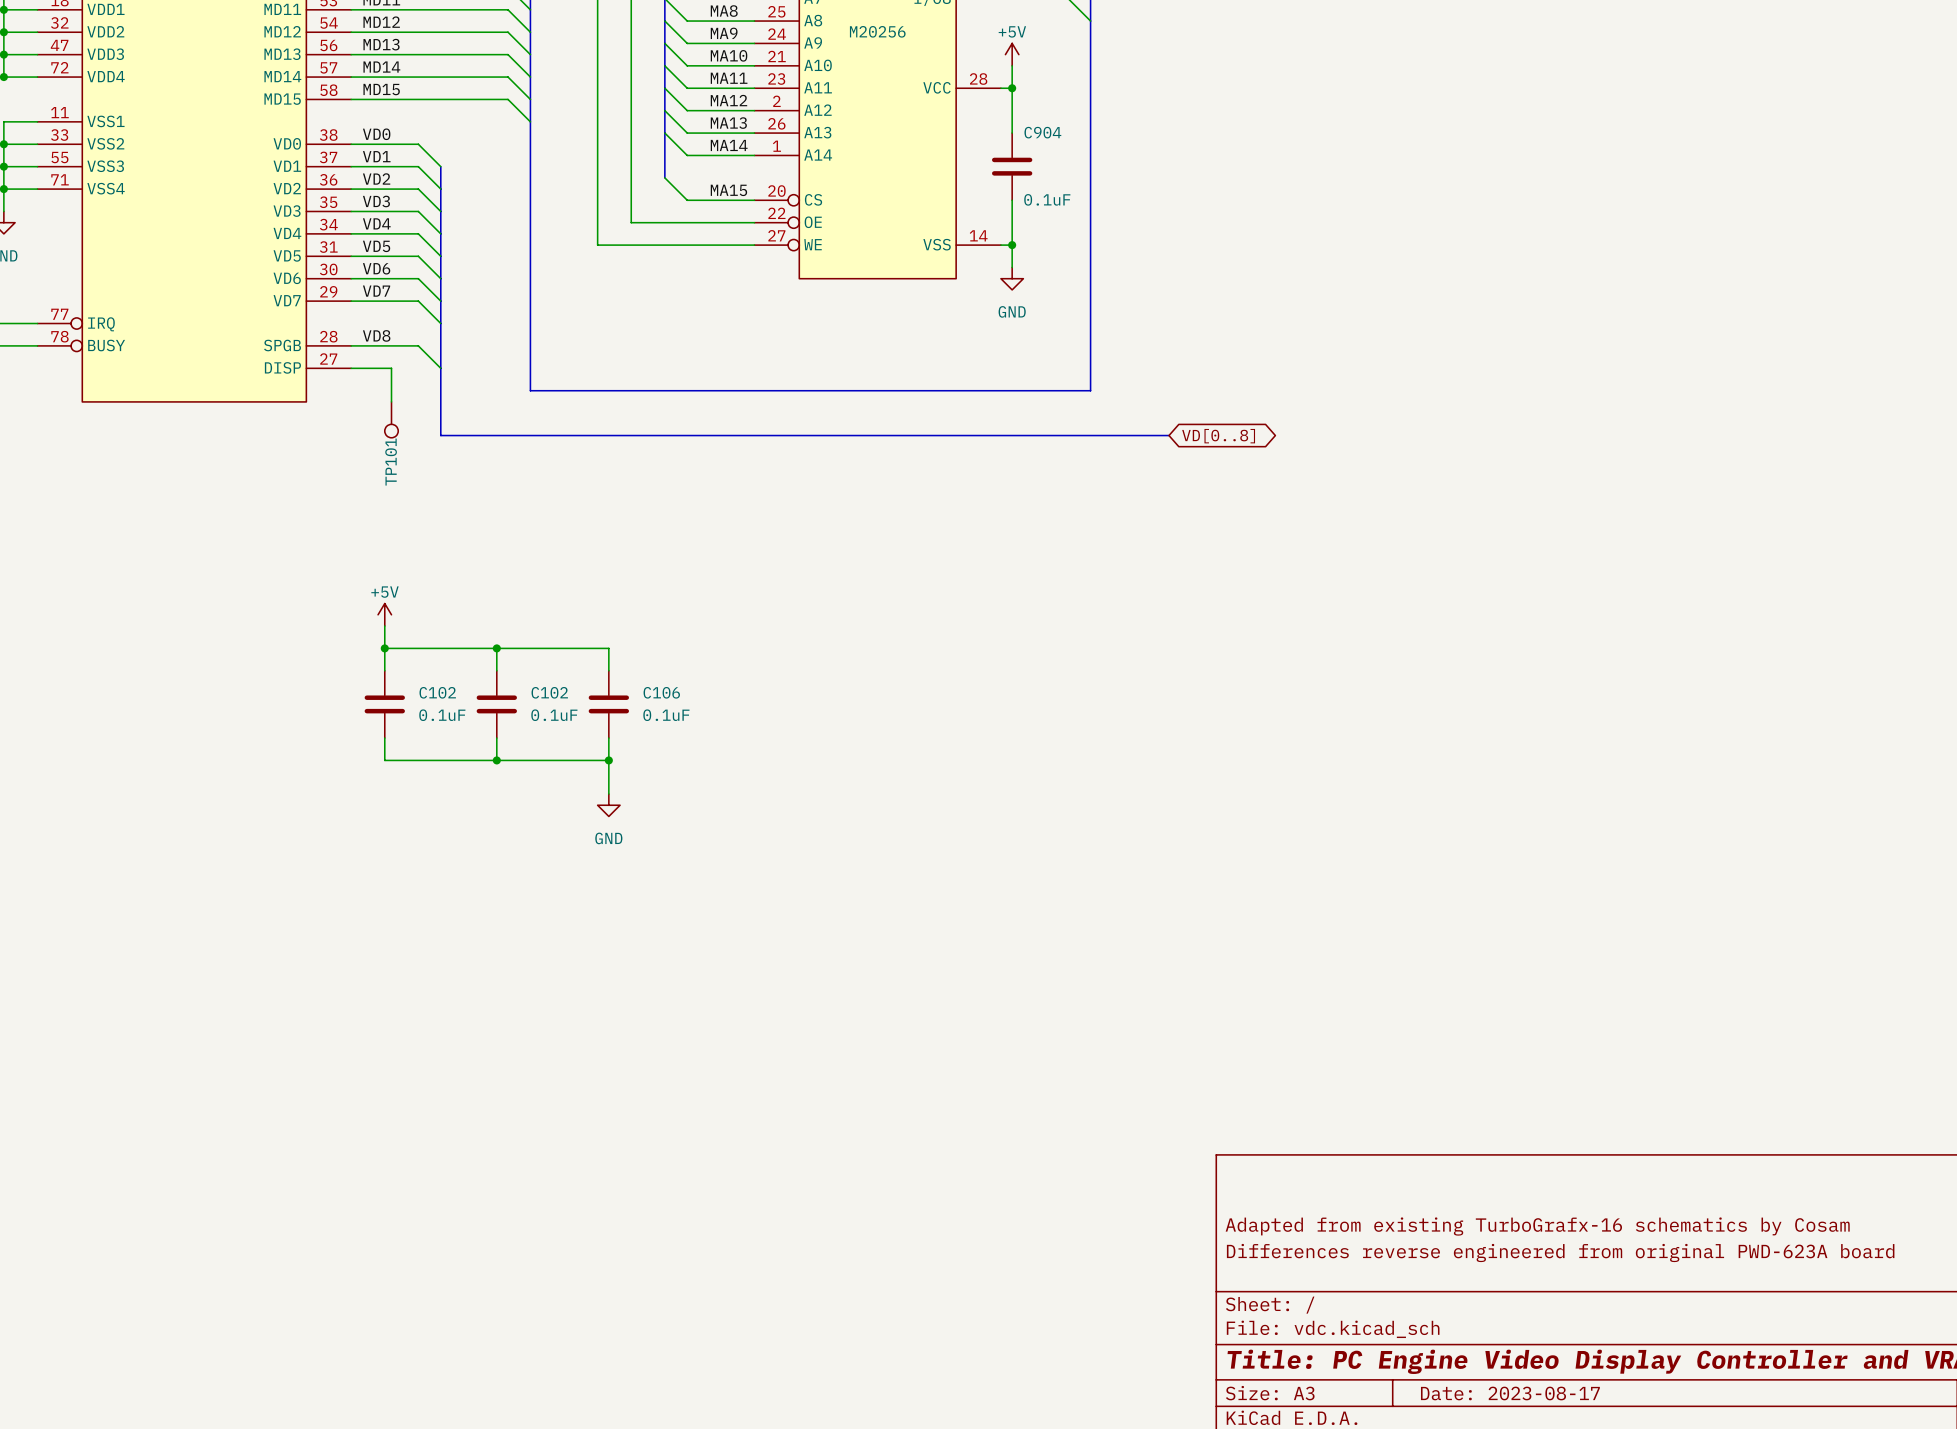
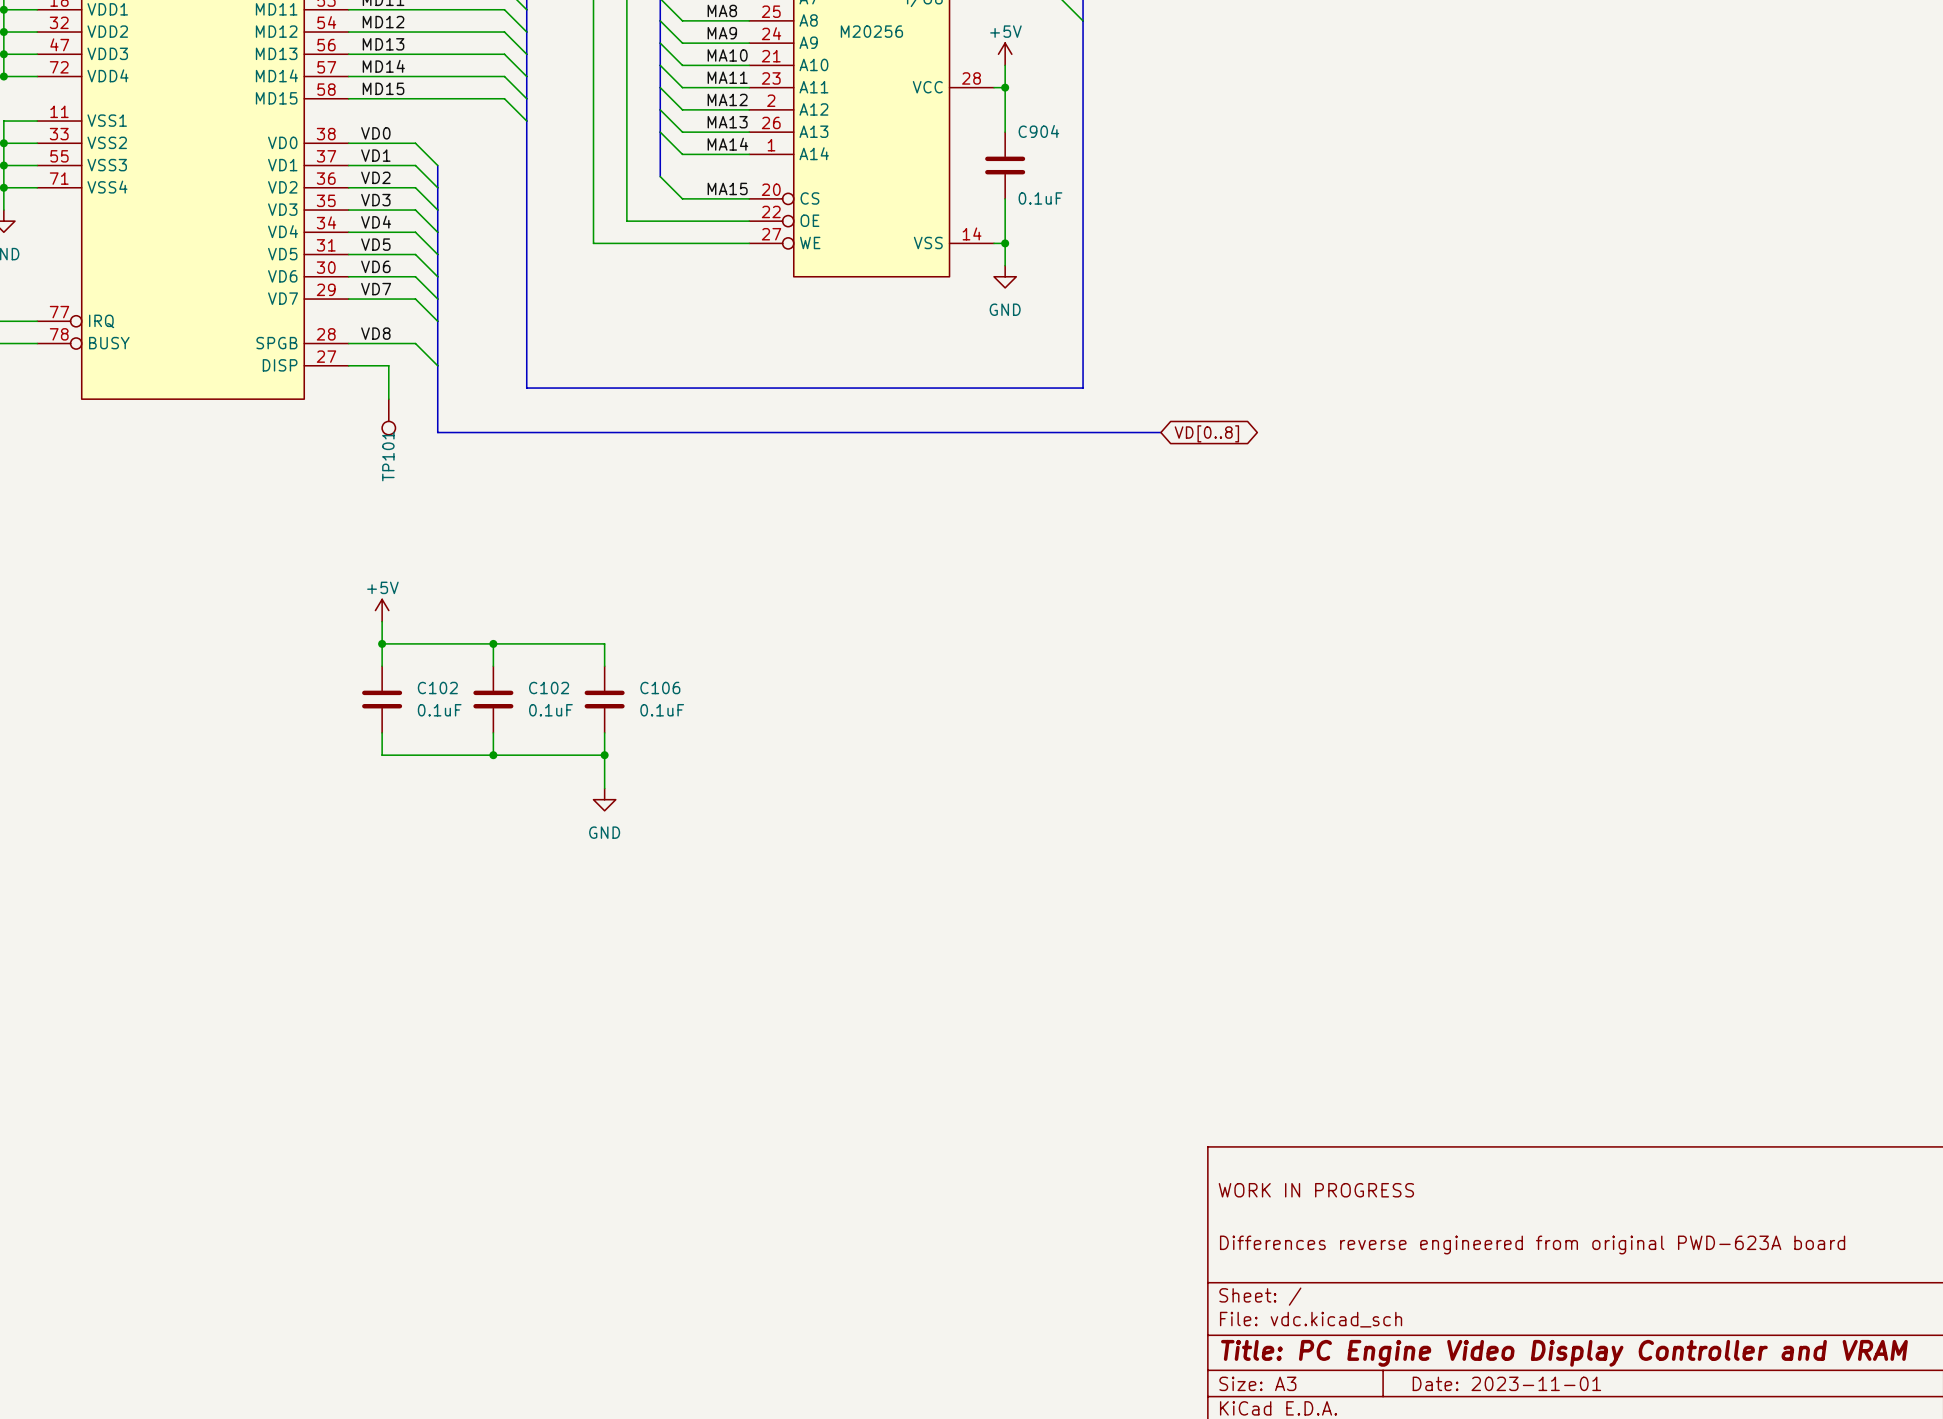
title block: none -> WORK IN PROGRESS (1316, 1190)
title block: Adapted from existing TurboGrafx-16 schematics by Cosam (1537, 1226) -> none
title block: Date: 2023-08-17 (1510, 1393) -> Date: 2023-11-01 (1506, 1383)

